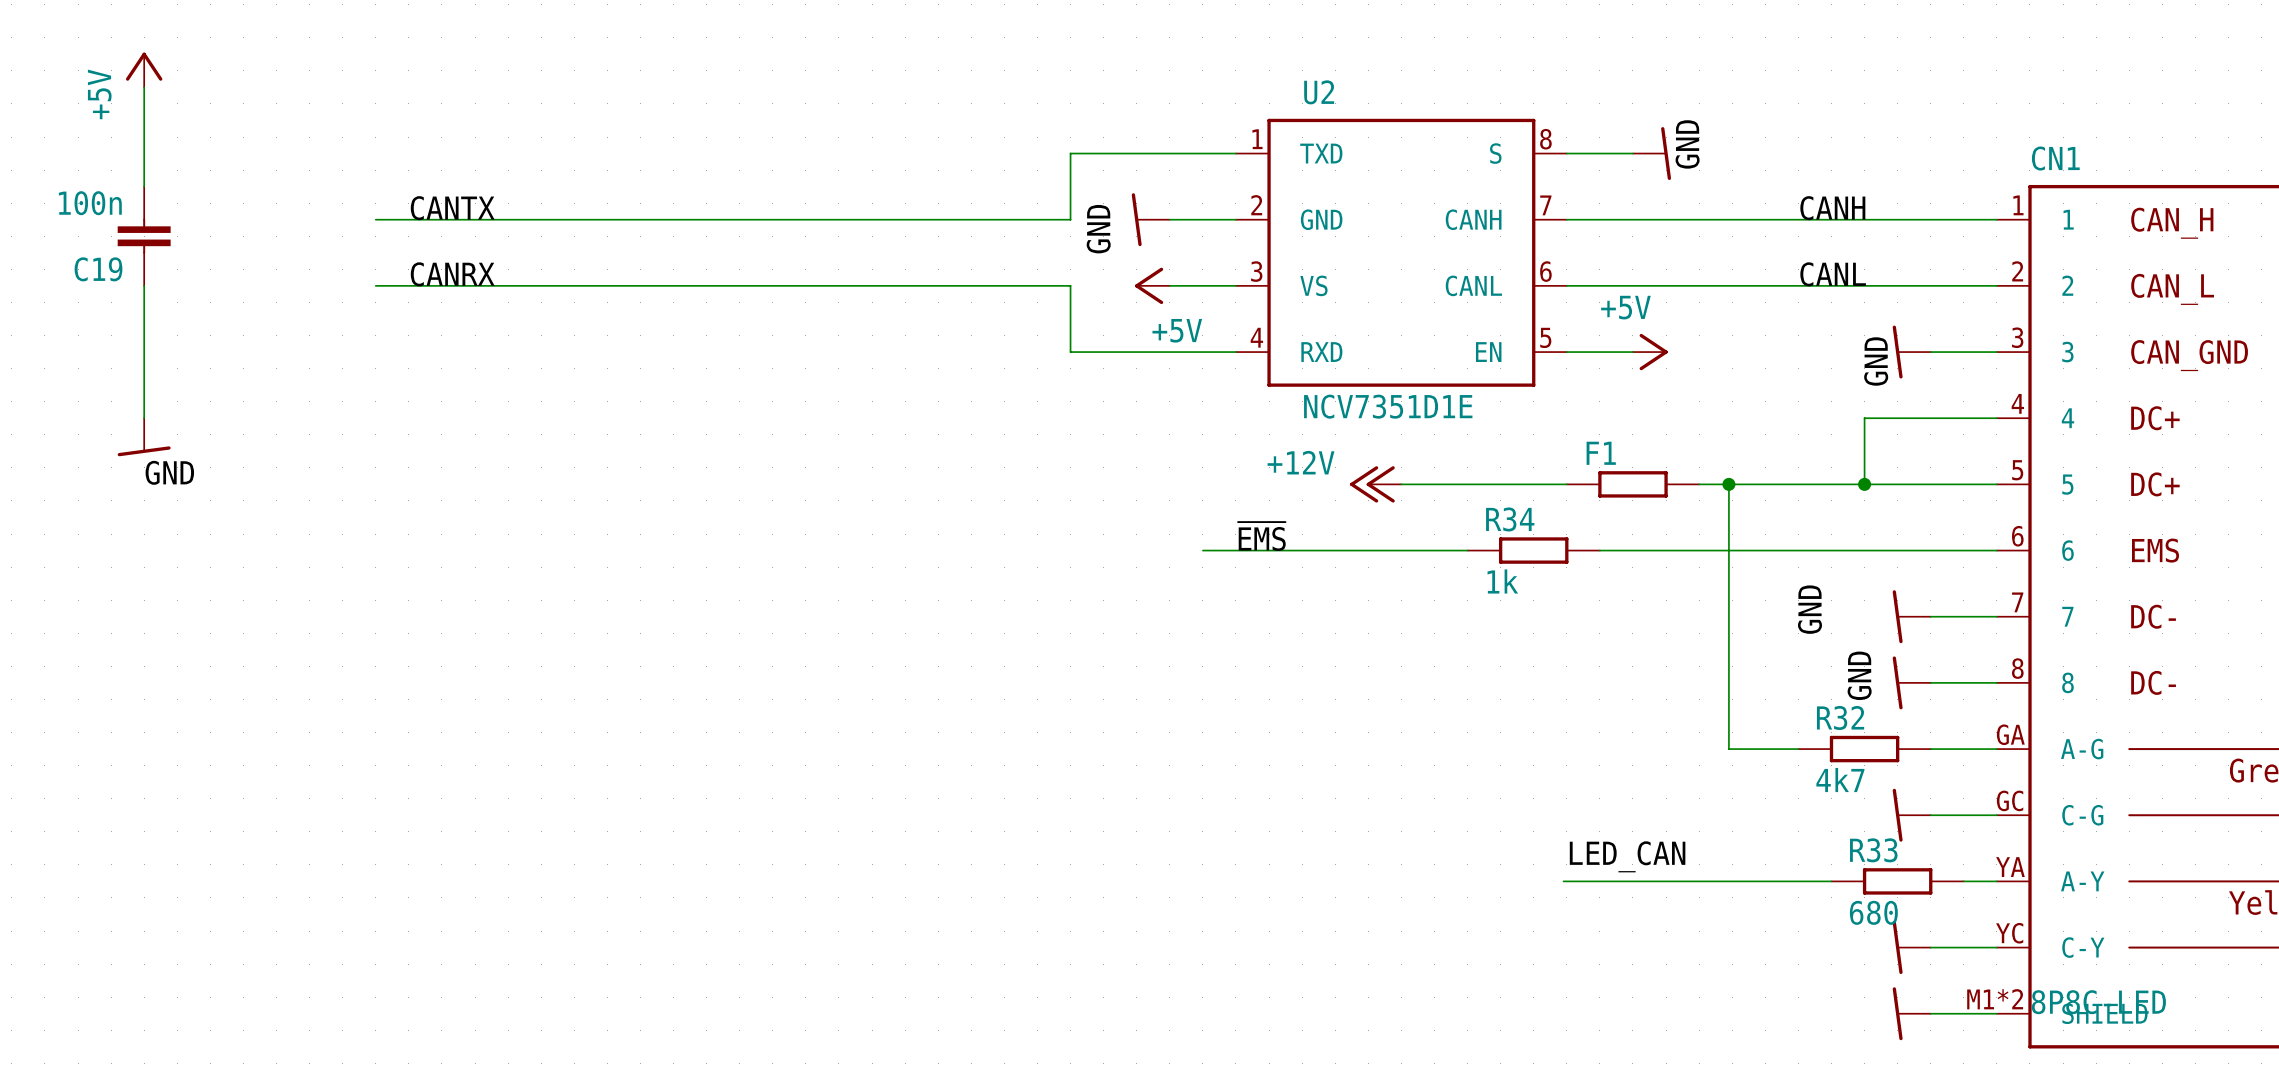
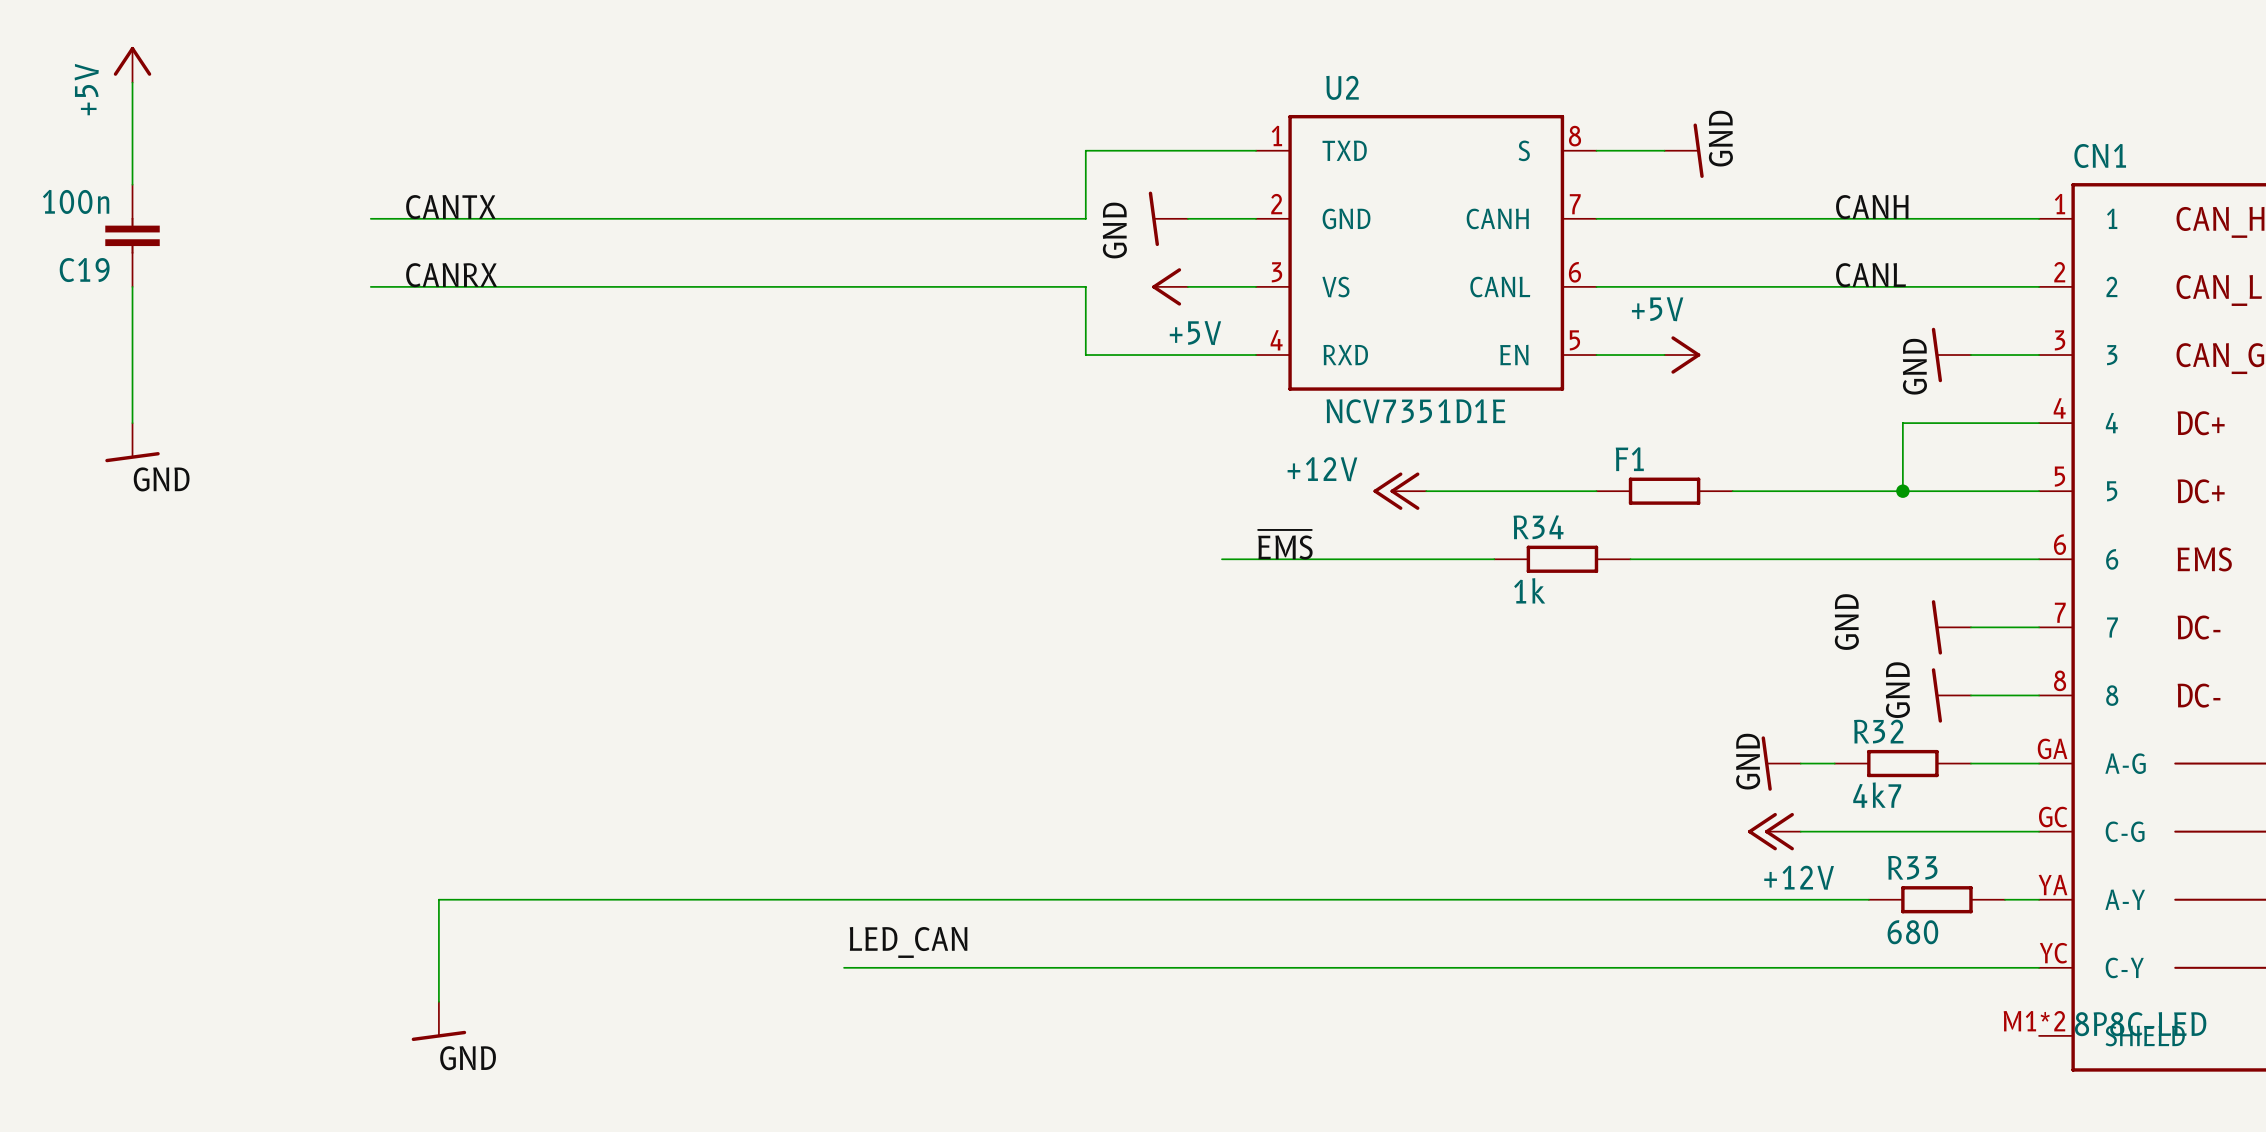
wire: (1728, 484) (1728, 749) (1765, 749) -> none
junction: (1728, 484) -> none
label: none -> GND (1748, 761)
power symbol: none -> (1781, 763)
power symbol: none -> +12V (1774, 831)
wire: none -> (1800, 831) (1970, 831)
power symbol: (1911, 815) -> none
label: LED_CAN (1627, 856) -> none
wire: none -> (1593, 899) (438, 899) (438, 1001)
label: none -> LED_CAN (908, 942)
wire: none -> (844, 967) (1970, 967)
power symbol: (1911, 947) -> none
power symbol: none -> (438, 1021)
power symbol: (1911, 1013) -> none
wire: (1930, 1013) (1996, 1013) -> none
label: none -> GND (468, 1058)

